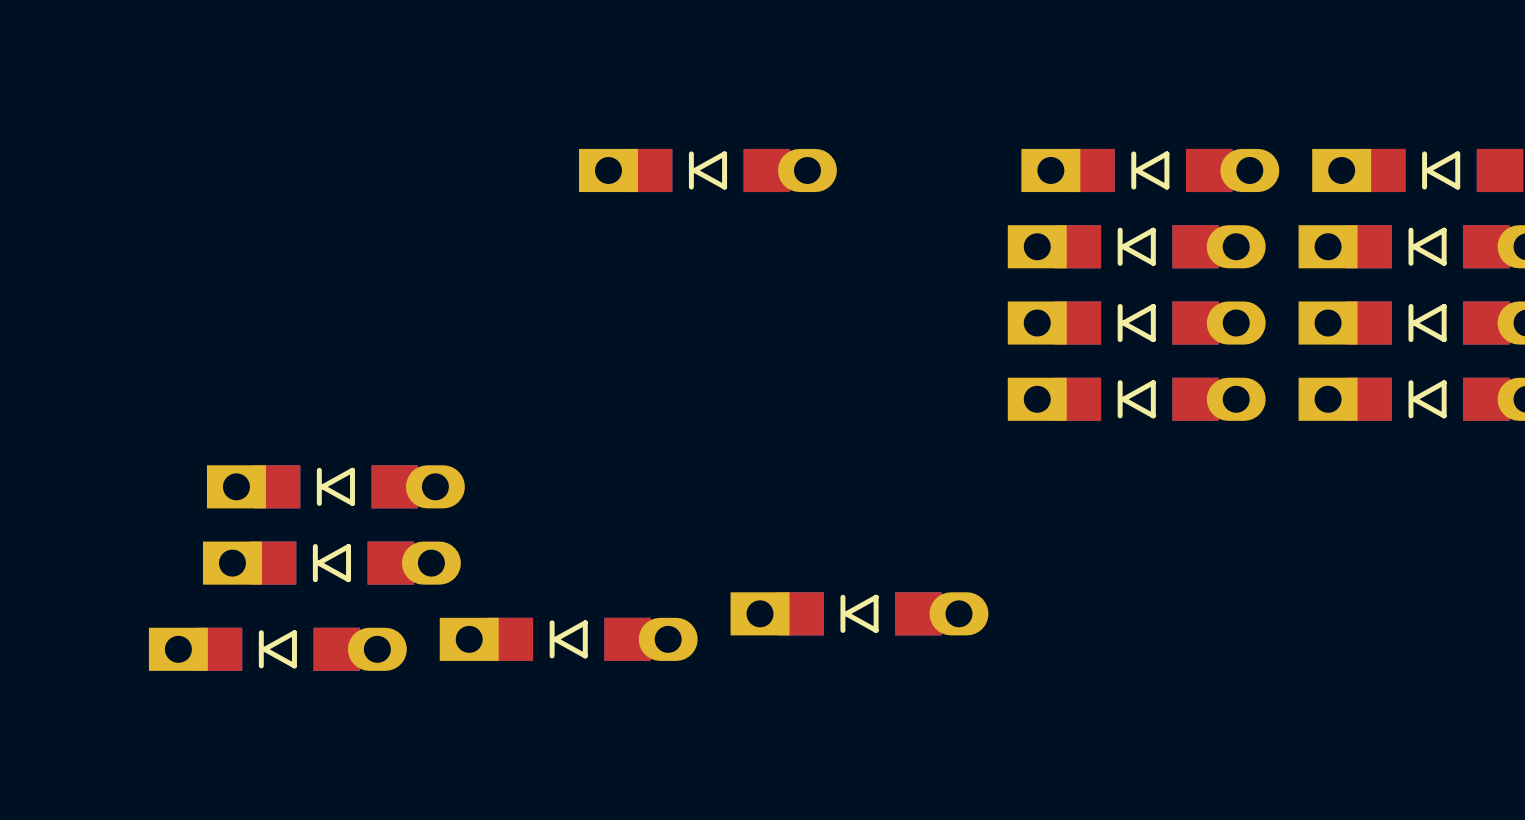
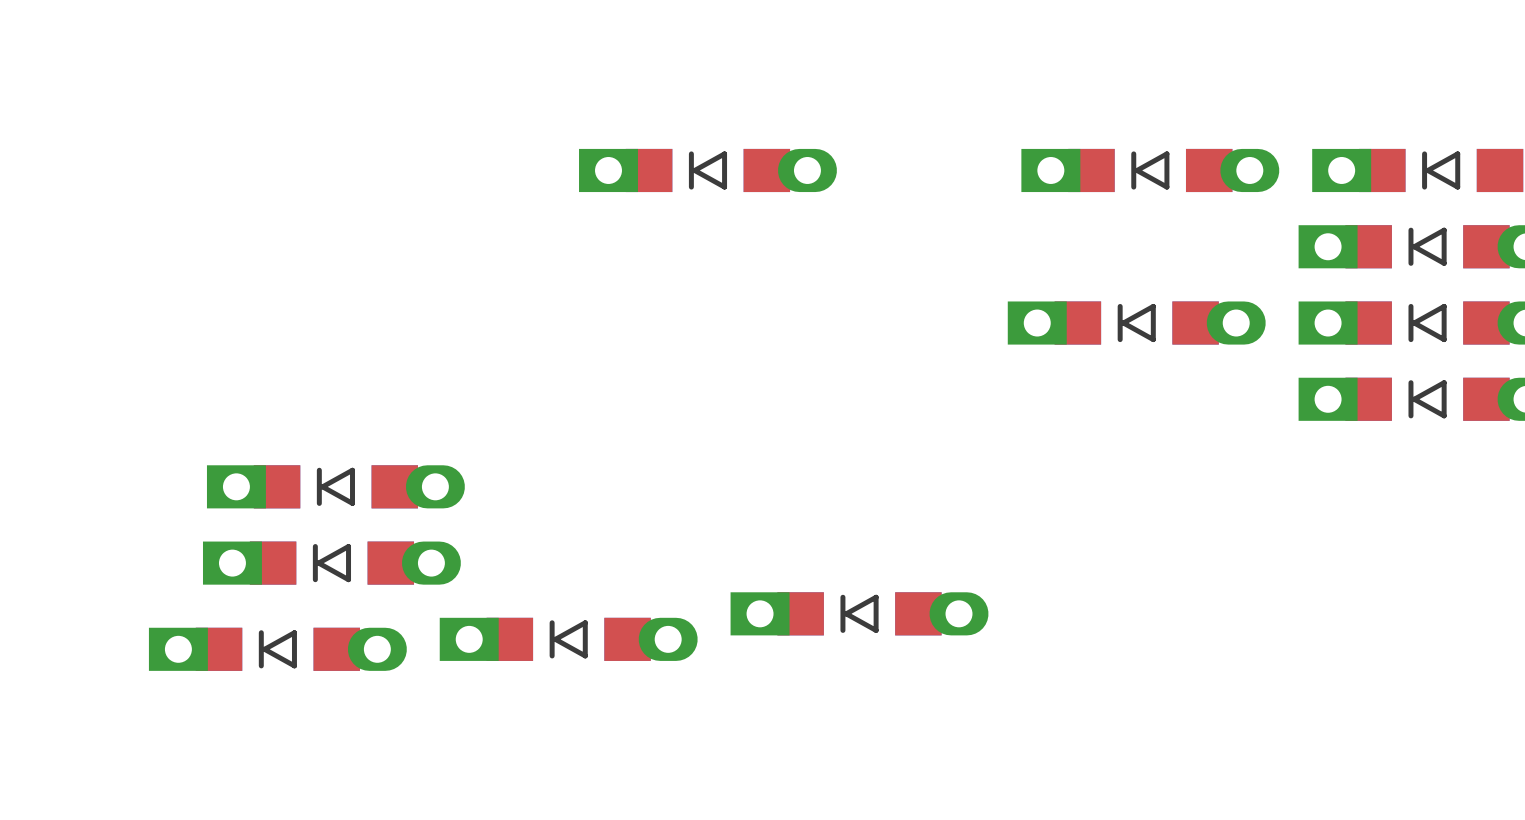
part: (1136, 246) -> none
part: (1136, 399) -> none

